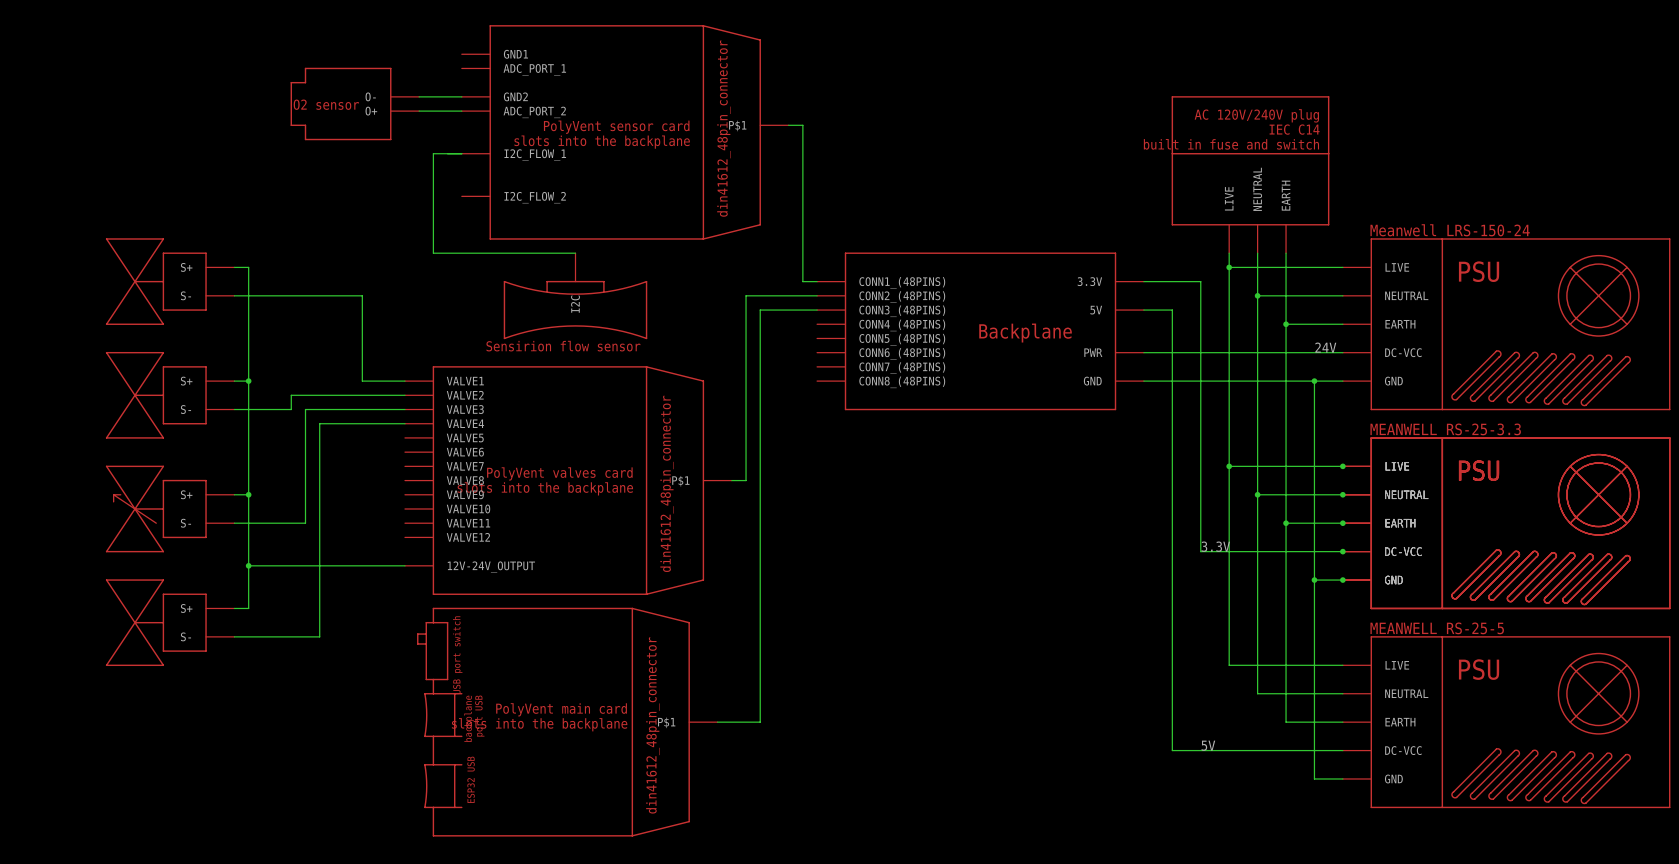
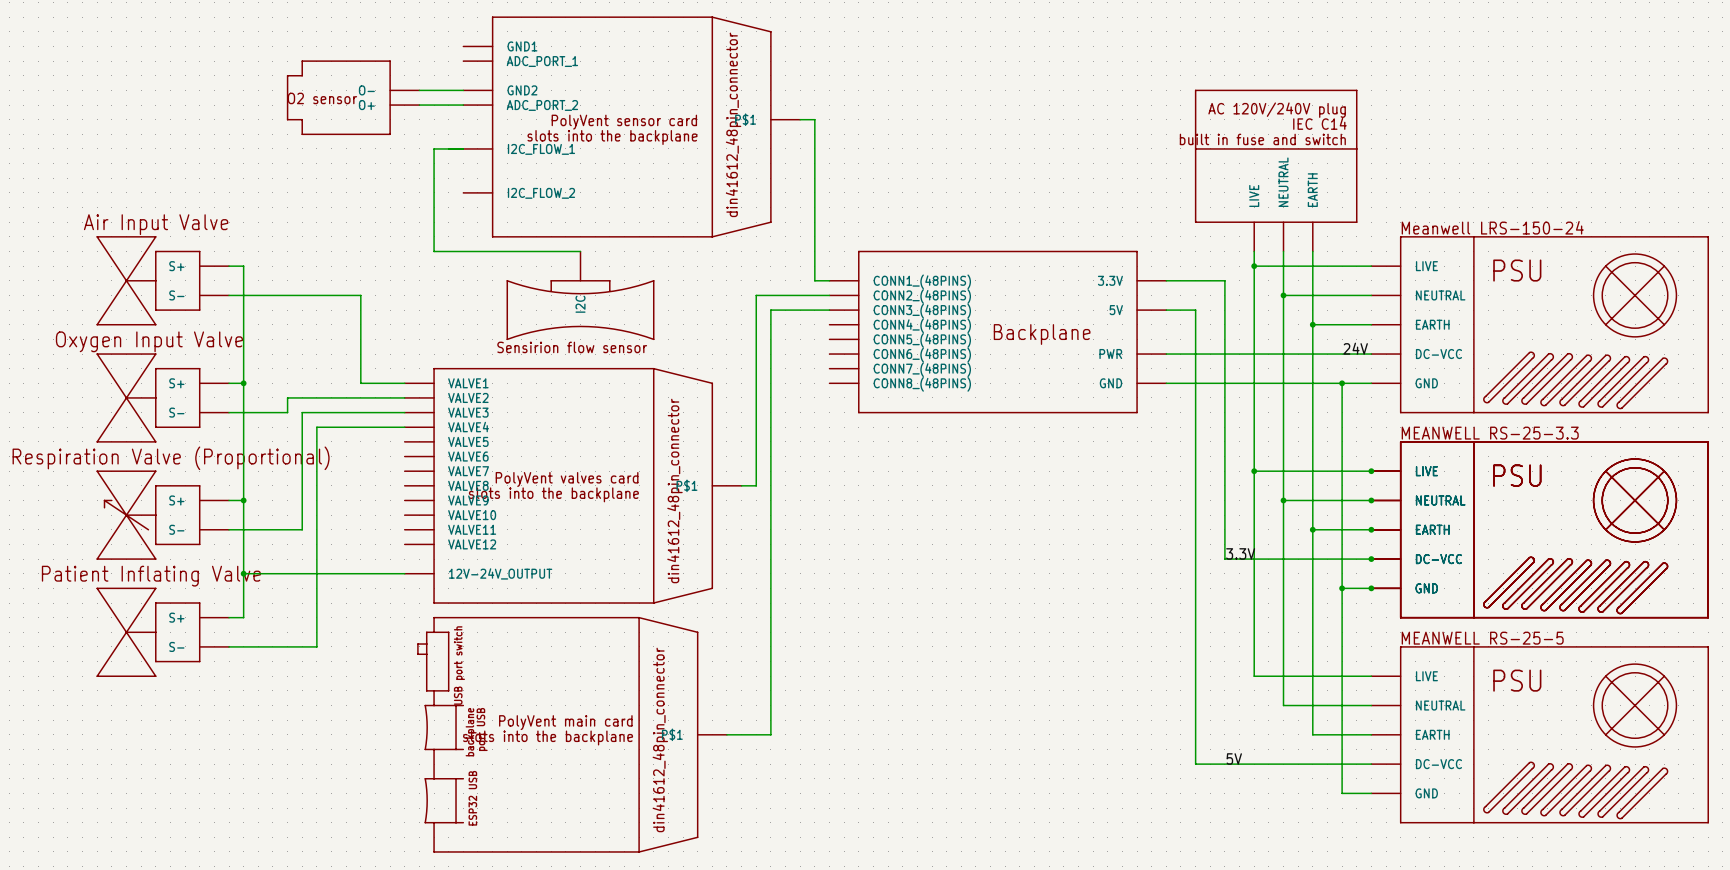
text: none -> Air Input Valve (156, 224)
text: none -> Oxygen Input Valve (149, 341)
text: none -> Respiration Valve (Proportional) (171, 458)
text: none -> Patient Inflating Valve (151, 576)

